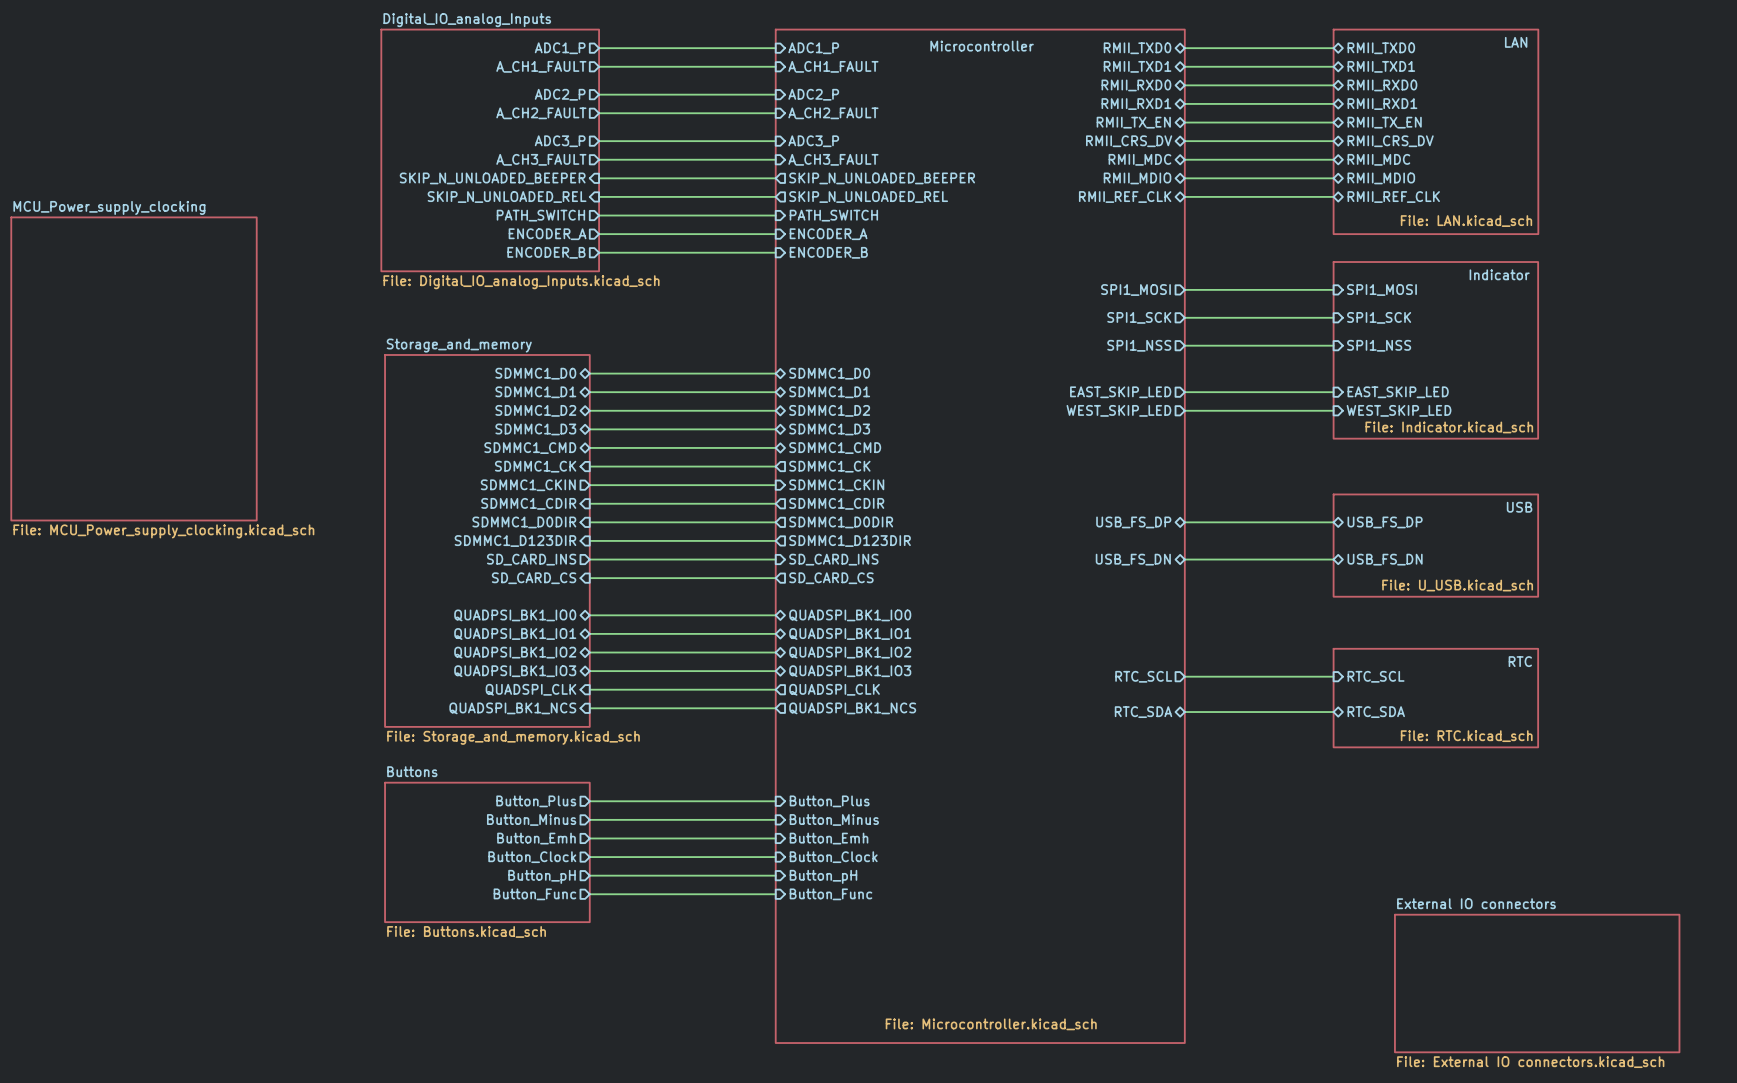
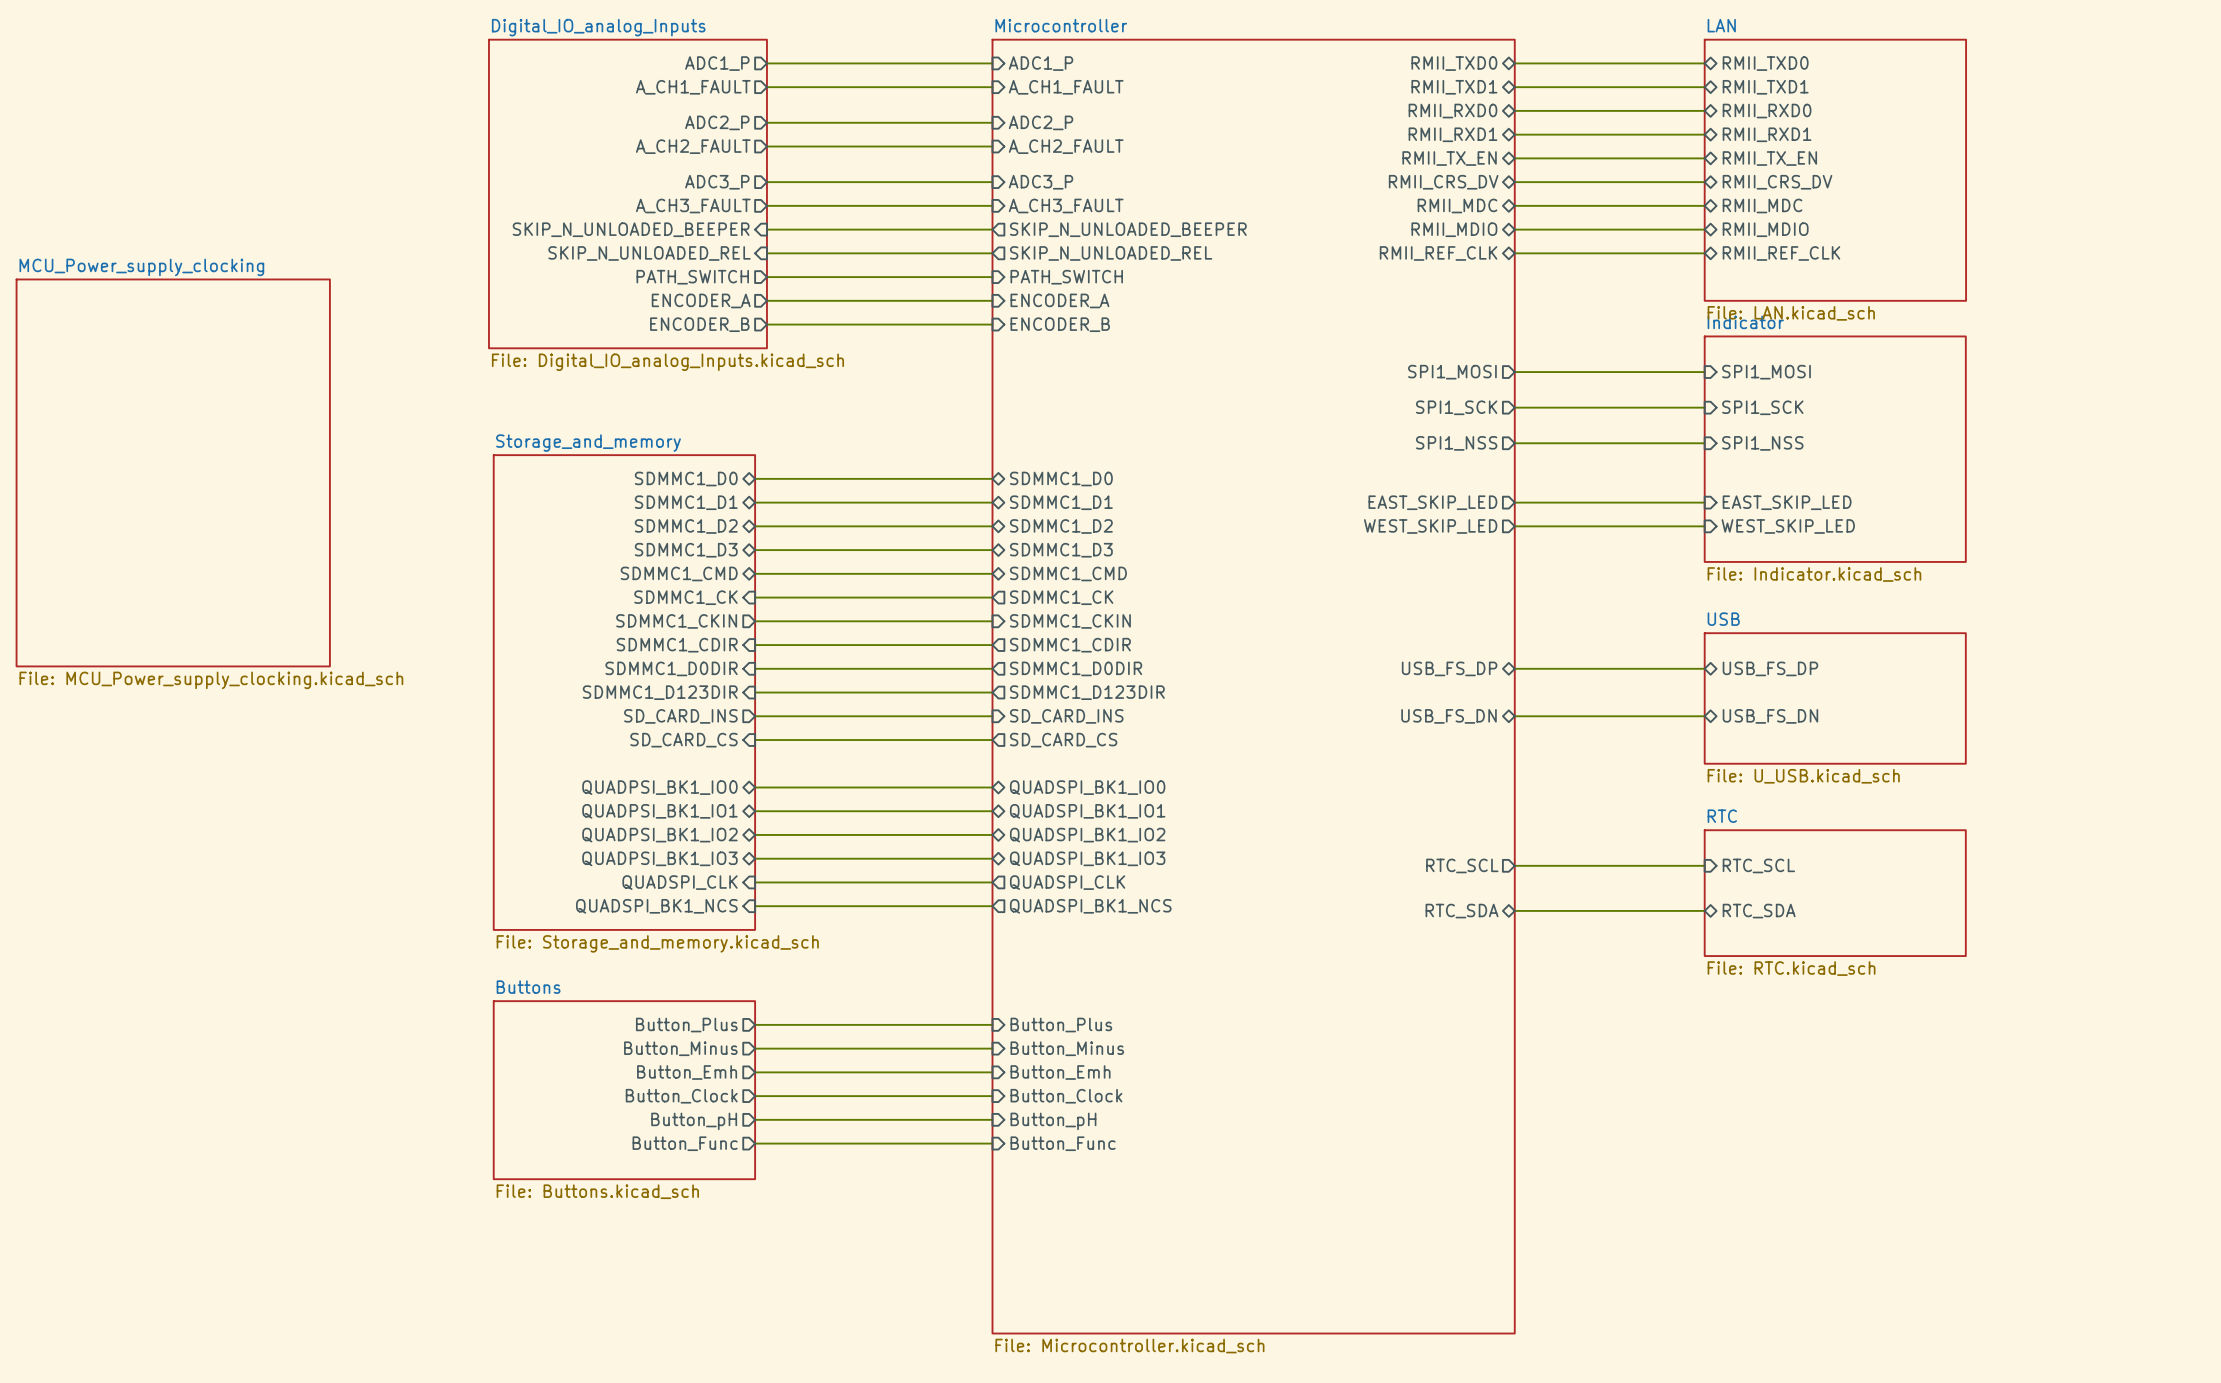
sheet LAN name position: LAN (1516, 42) -> LAN (1721, 25)
sheet Microcontroller name position: Microcontroller (982, 46) -> Microcontroller (1061, 25)
sheet LAN value position: File: LAN.kicad_sch (1466, 221) -> File: LAN.kicad_sch (1791, 313)
sheet Indicator name position: Indicator (1499, 274) -> Indicator (1745, 322)
sheet Indicator value position: File: Indicator.kicad_sch (1449, 427) -> File: Indicator.kicad_sch (1814, 574)
sheet USB name position: USB (1519, 507) -> USB (1723, 619)
sheet USB value position: File: U_USB.kicad_sch (1457, 585) -> File: U_USB.kicad_sch (1803, 776)
sheet RTC name position: RTC (1520, 661) -> RTC (1722, 816)
sheet RTC value position: File: RTC.kicad_sch (1466, 736) -> File: RTC.kicad_sch (1791, 968)
sheet External IO connectors: File: External IO connectors.kicad_sch (1537, 983) -> none
sheet Microcontroller value position: File: Microcontroller.kicad_sch (991, 1024) -> File: Microcontroller.kicad_sch (1129, 1346)

